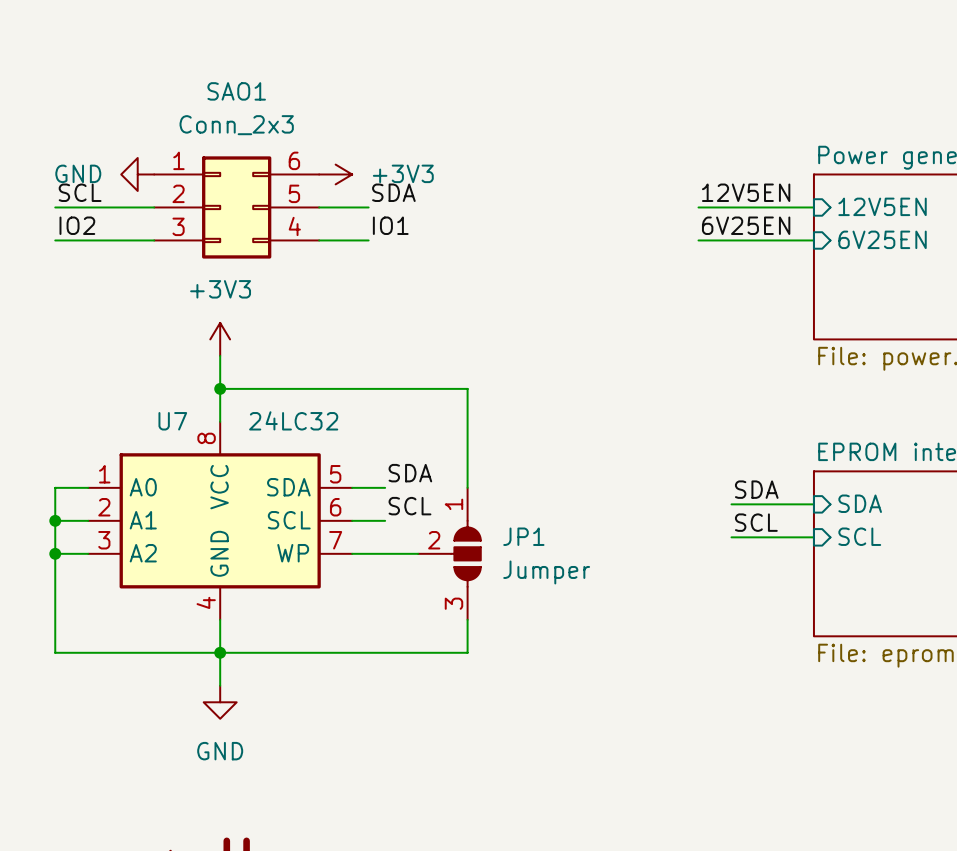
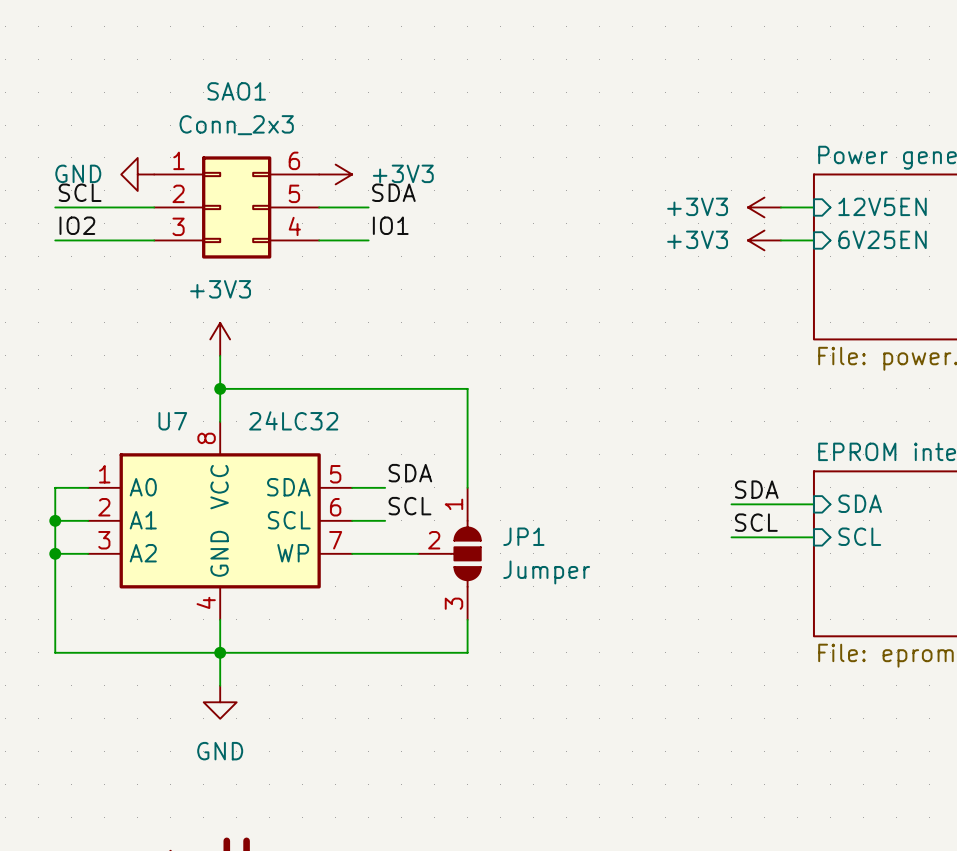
label: 12V5EN (746, 192) -> none
wire: (698, 207) (780, 207) -> none
power symbol: none -> +3V3 (764, 207)
label: 6V25EN (746, 225) -> none
wire: (698, 240) (780, 240) -> none
power symbol: none -> +3V3 (764, 240)

